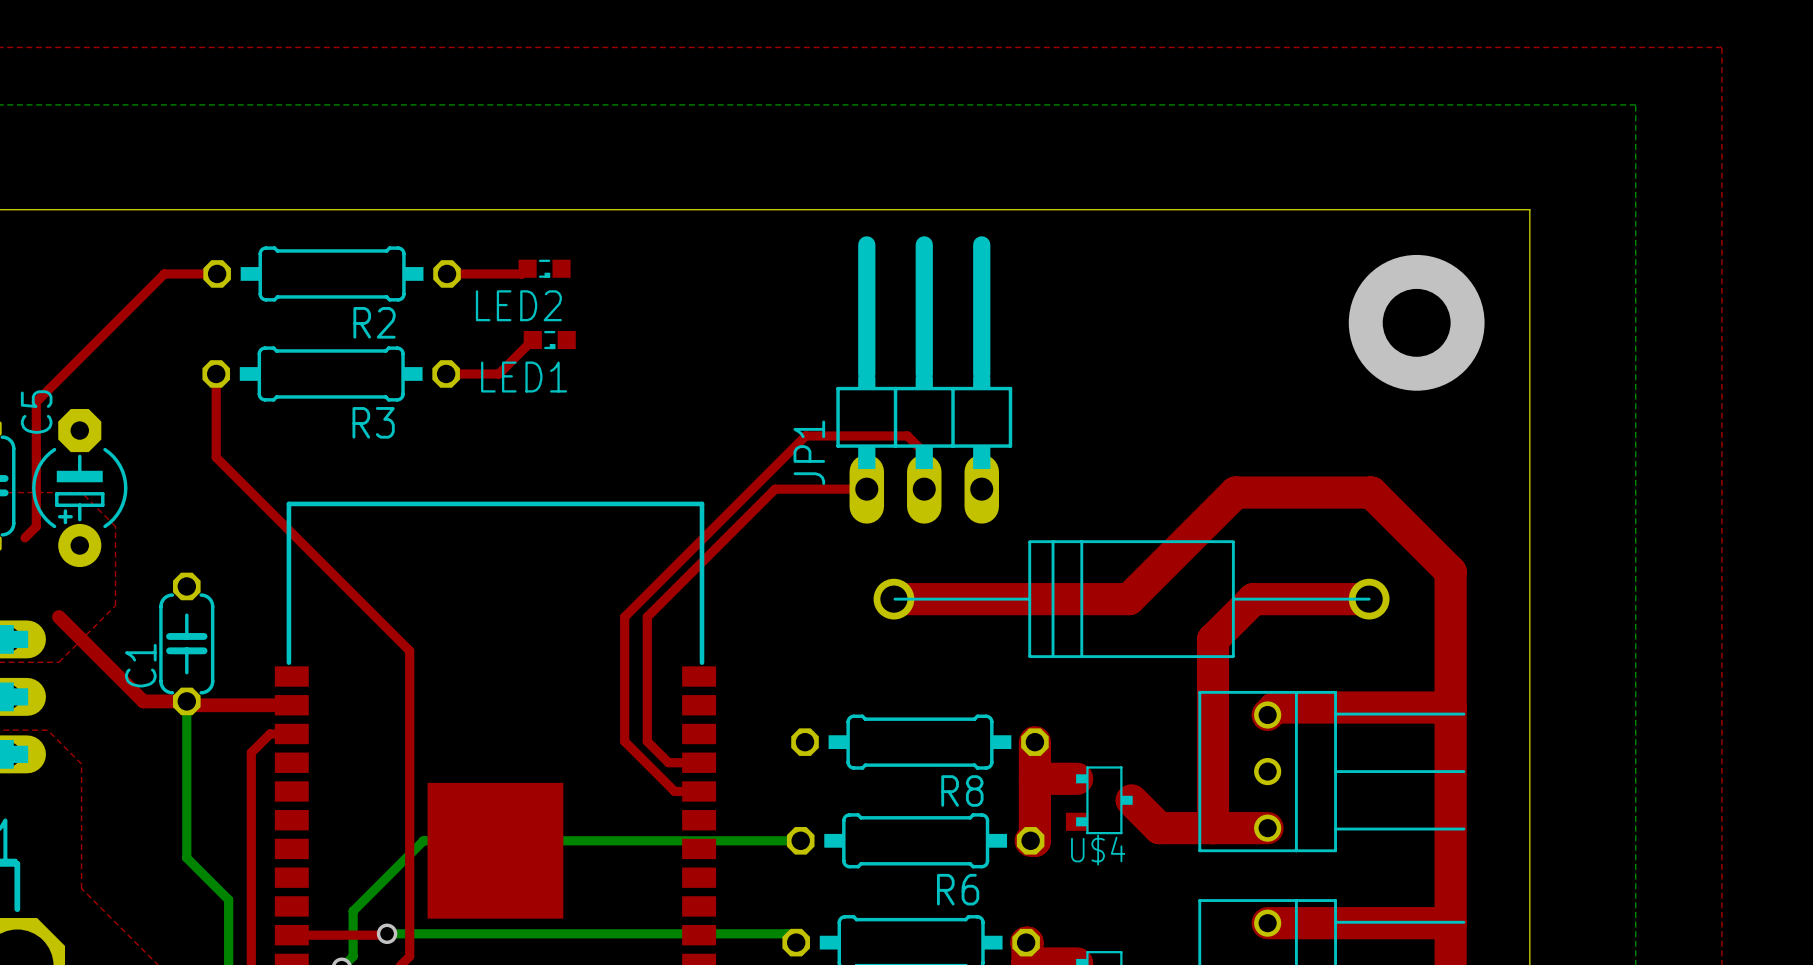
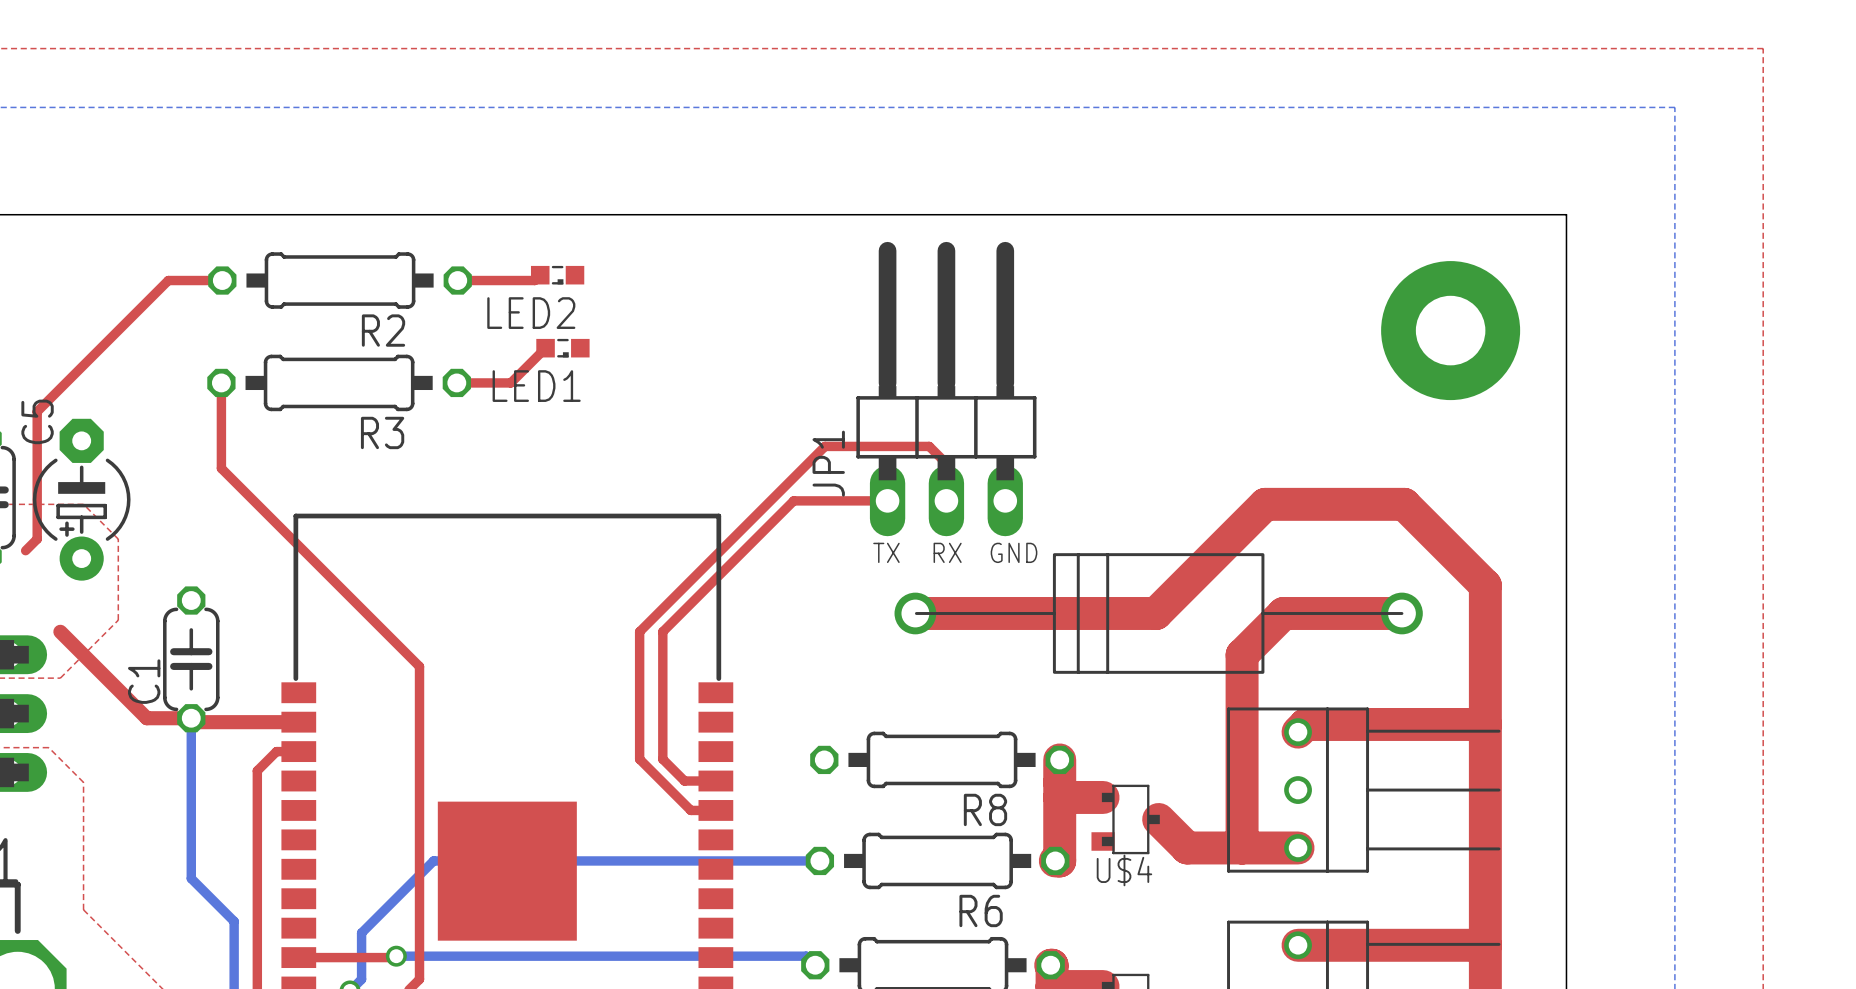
text: none -> TX (886, 552)
text: none -> RX (947, 552)
text: none -> GND (1014, 552)

